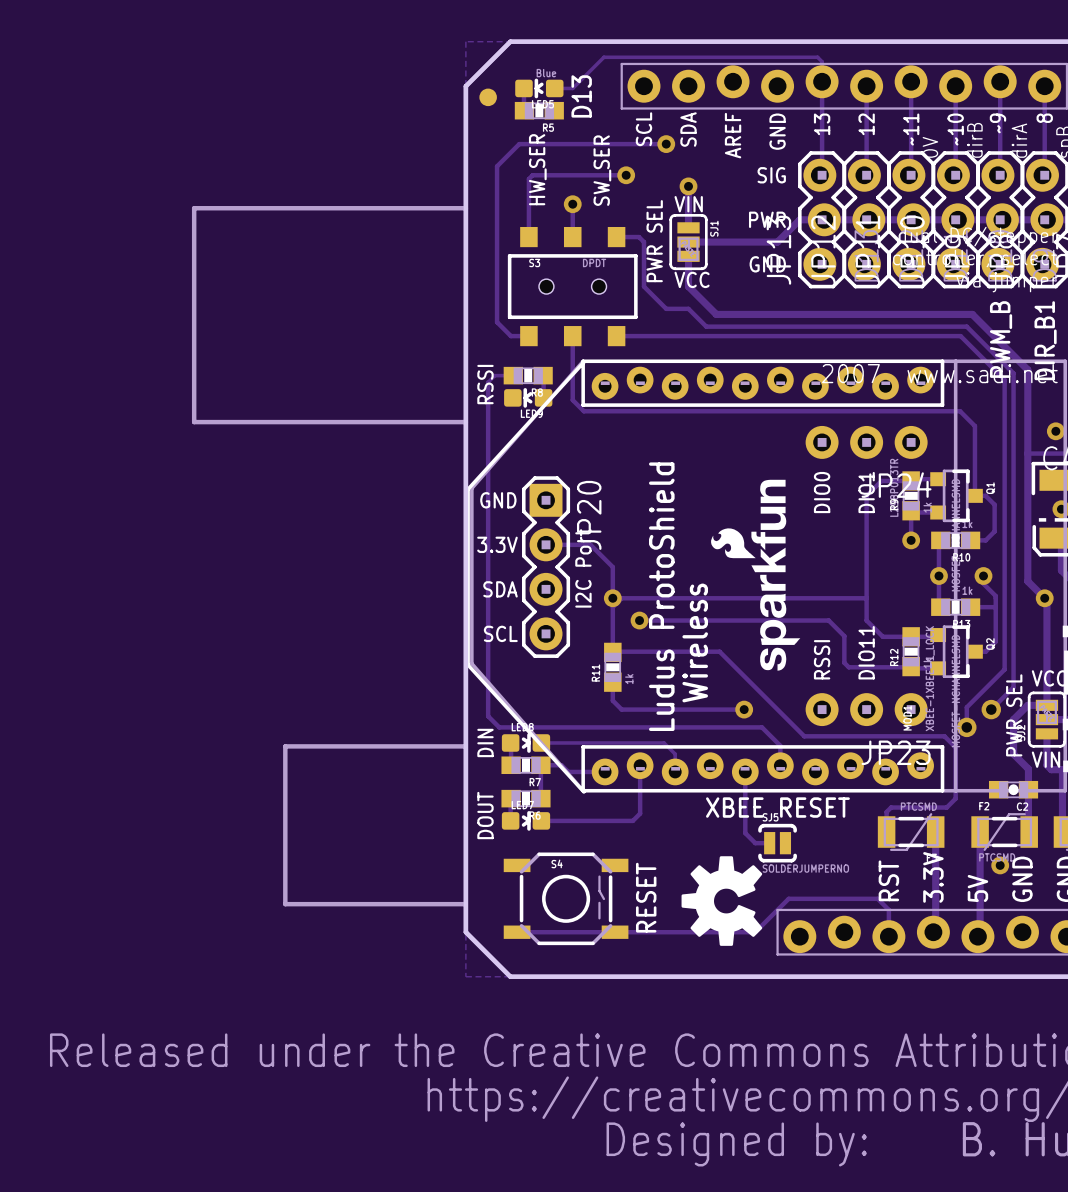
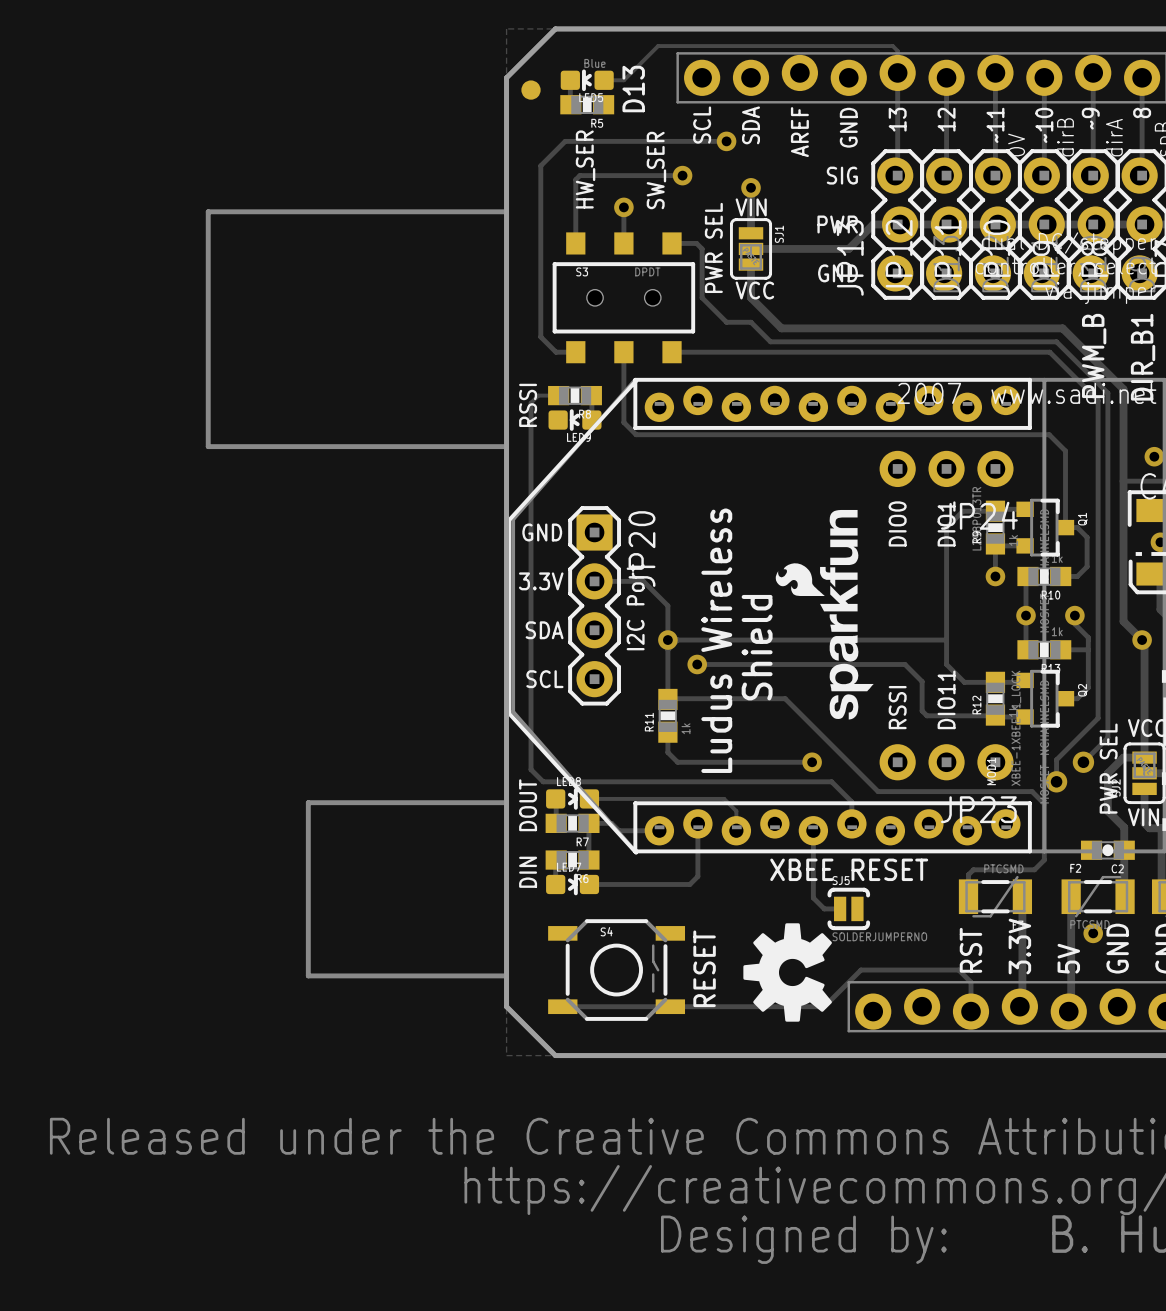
text: Ludus ProtoShield (661, 596) -> Ludus Wireless (716, 640)
text: Wireless (695, 642) -> Shield (757, 647)
text: DIN (485, 742) -> DOUT (528, 805)
text: DOUT (485, 815) -> DIN (528, 872)

